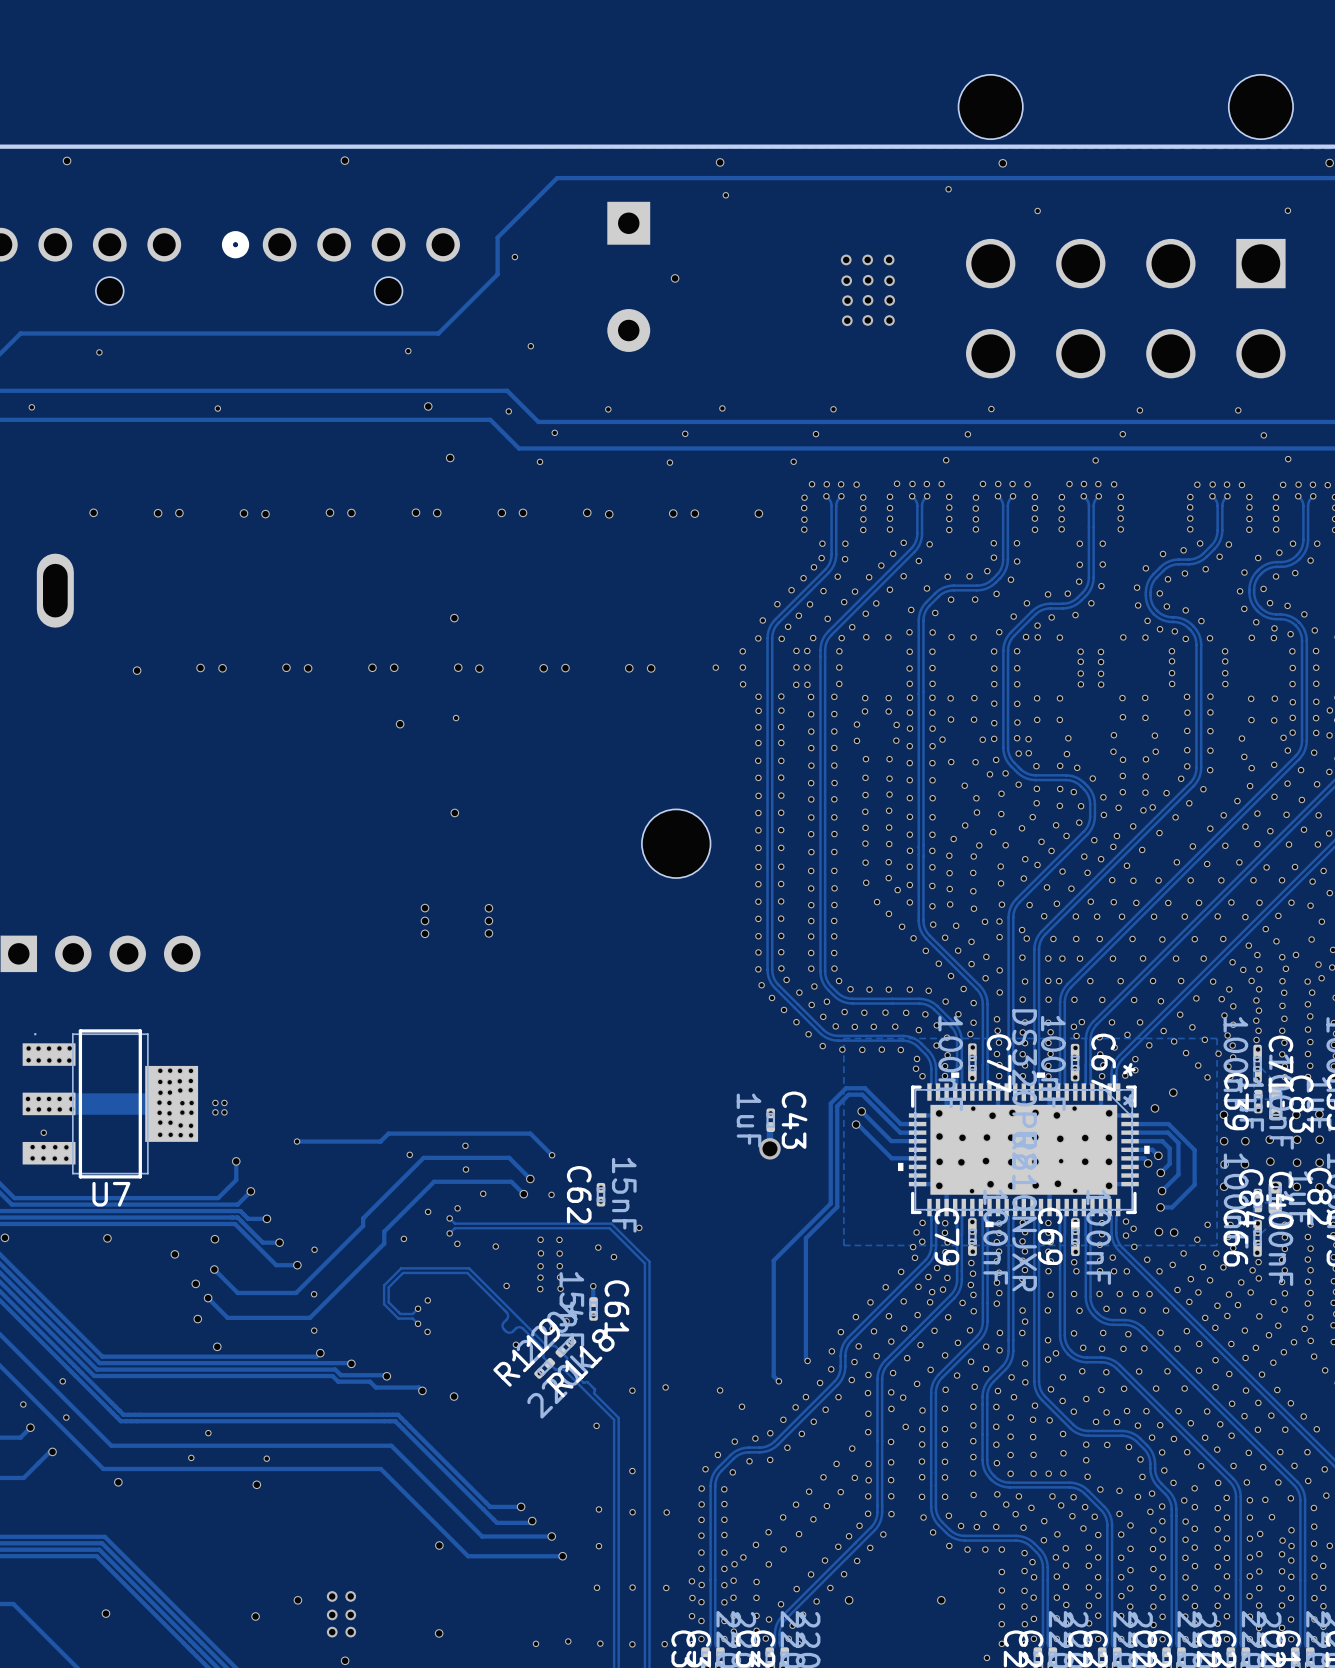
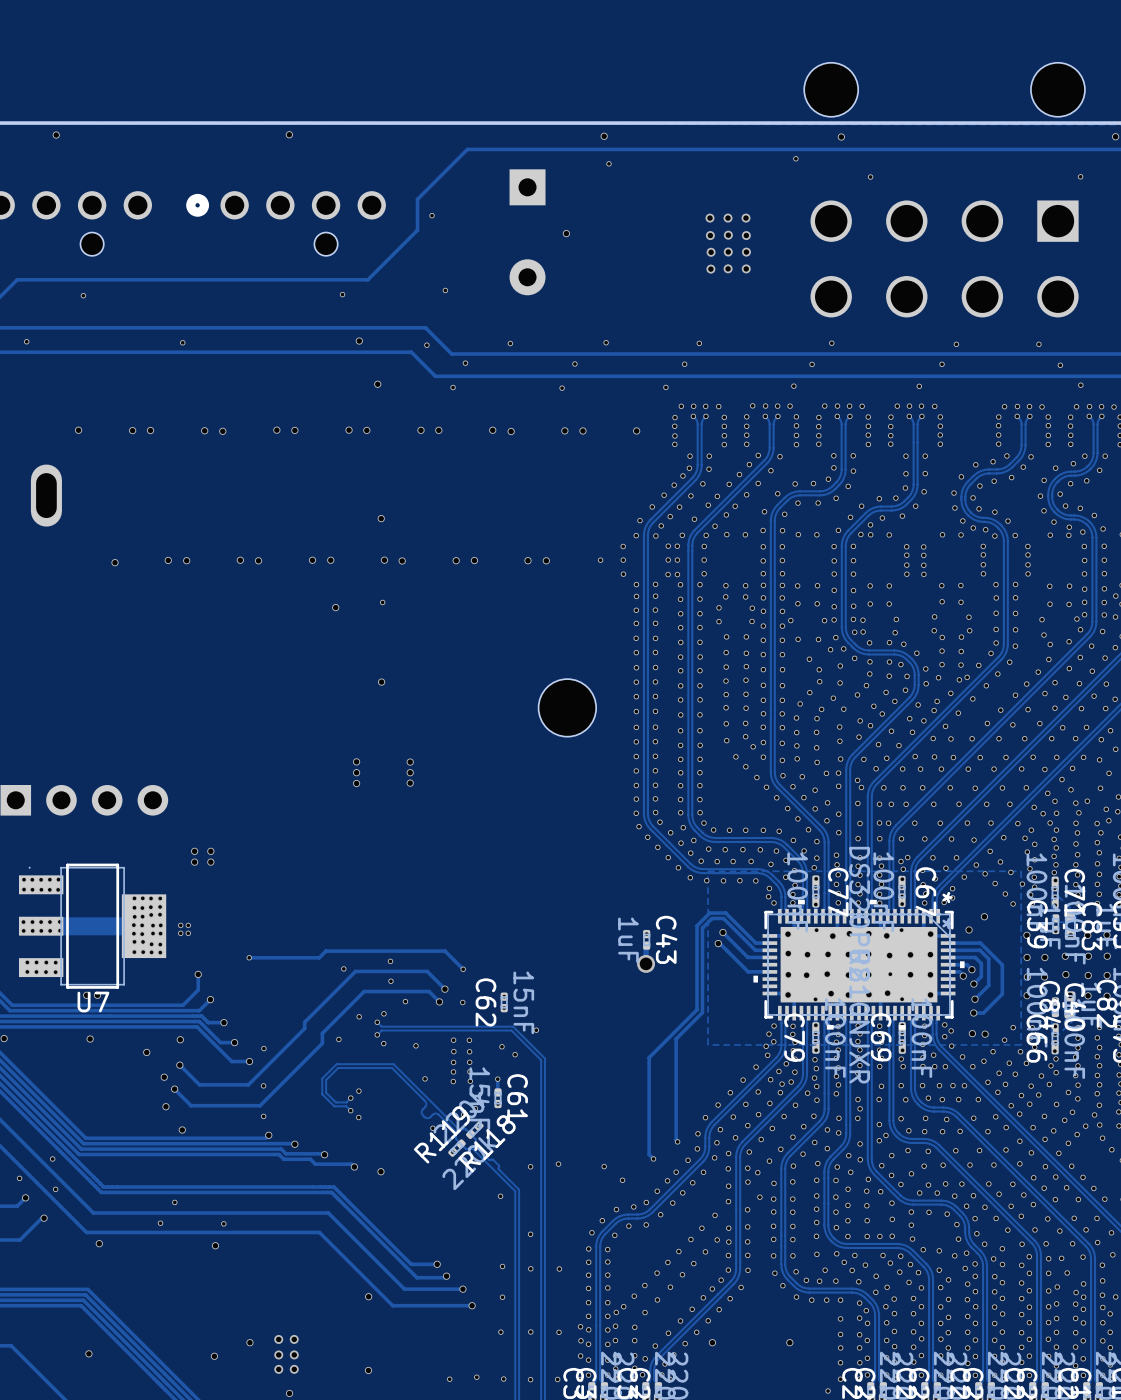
via: none -> (194, 851)
via: none -> (210, 851)
via: none -> (194, 862)
via: none -> (210, 862)
via: (43, 1132) -> none
via: none -> (86, 995)
via: none -> (97, 995)

